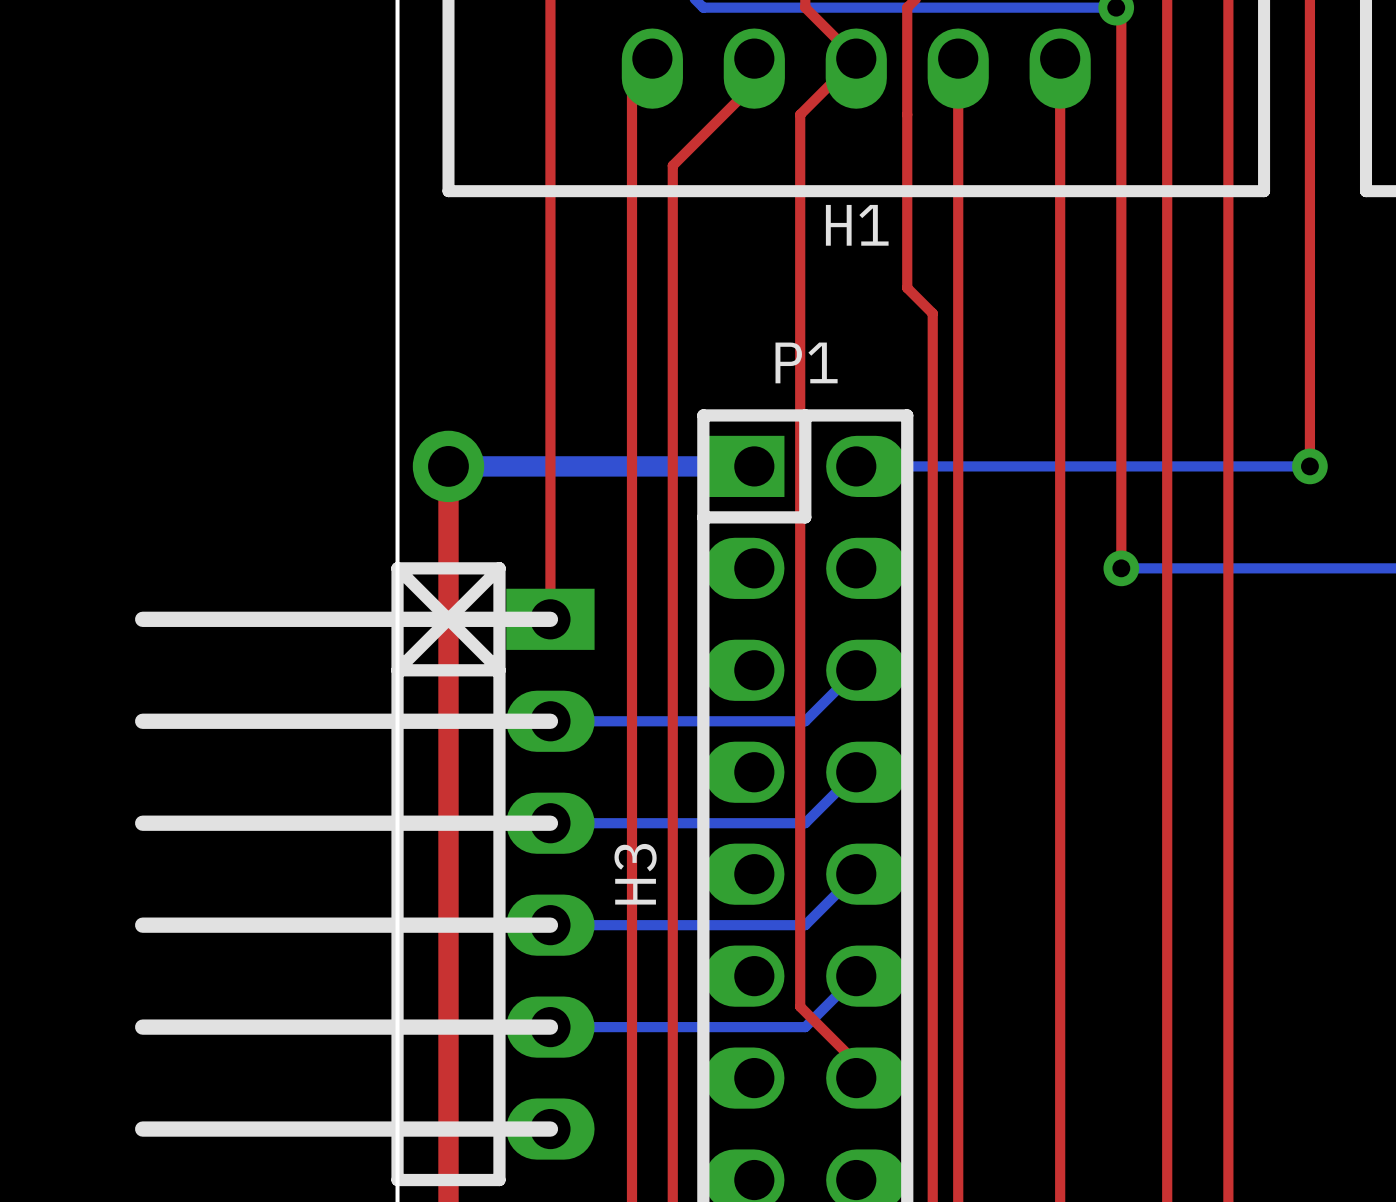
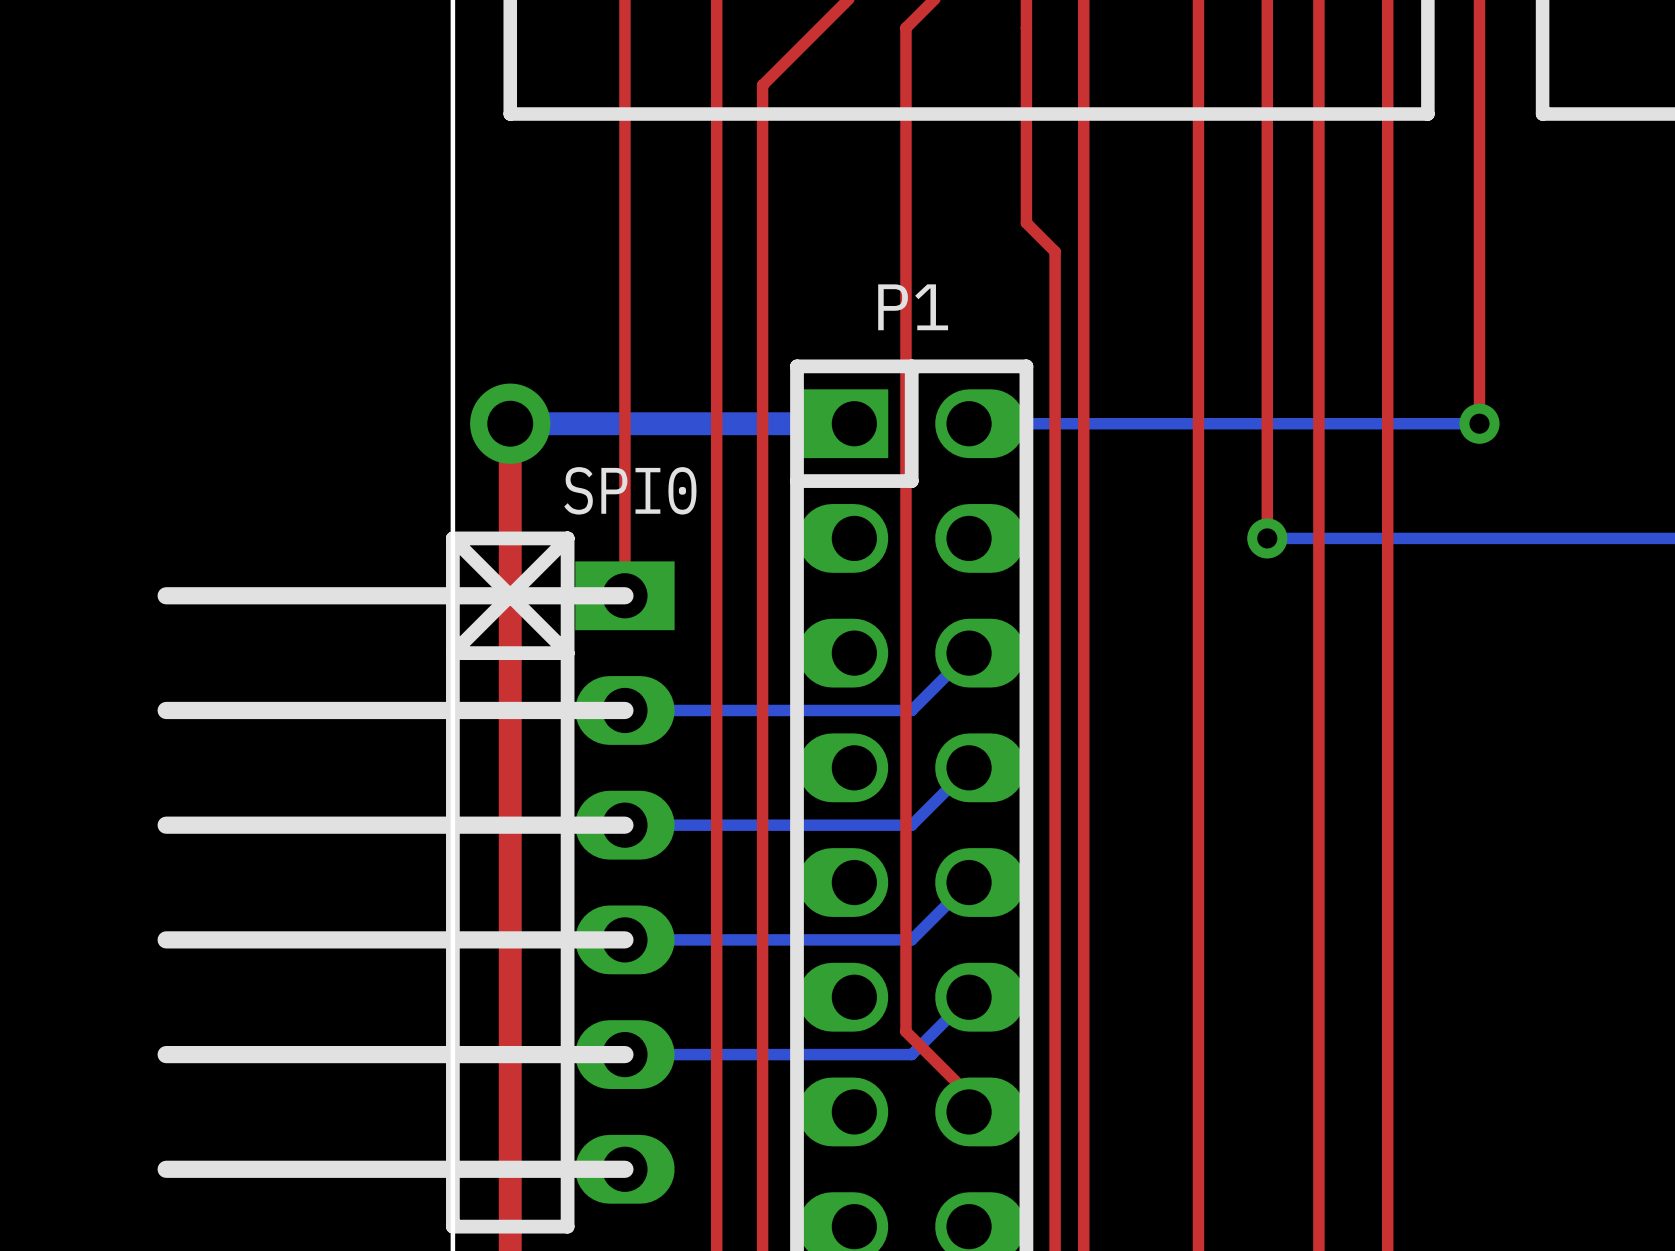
H1 name: H1 (857, 225) -> none
H3 value: none -> SPI0 (630, 490)
H3 name: H3 (635, 874) -> none

